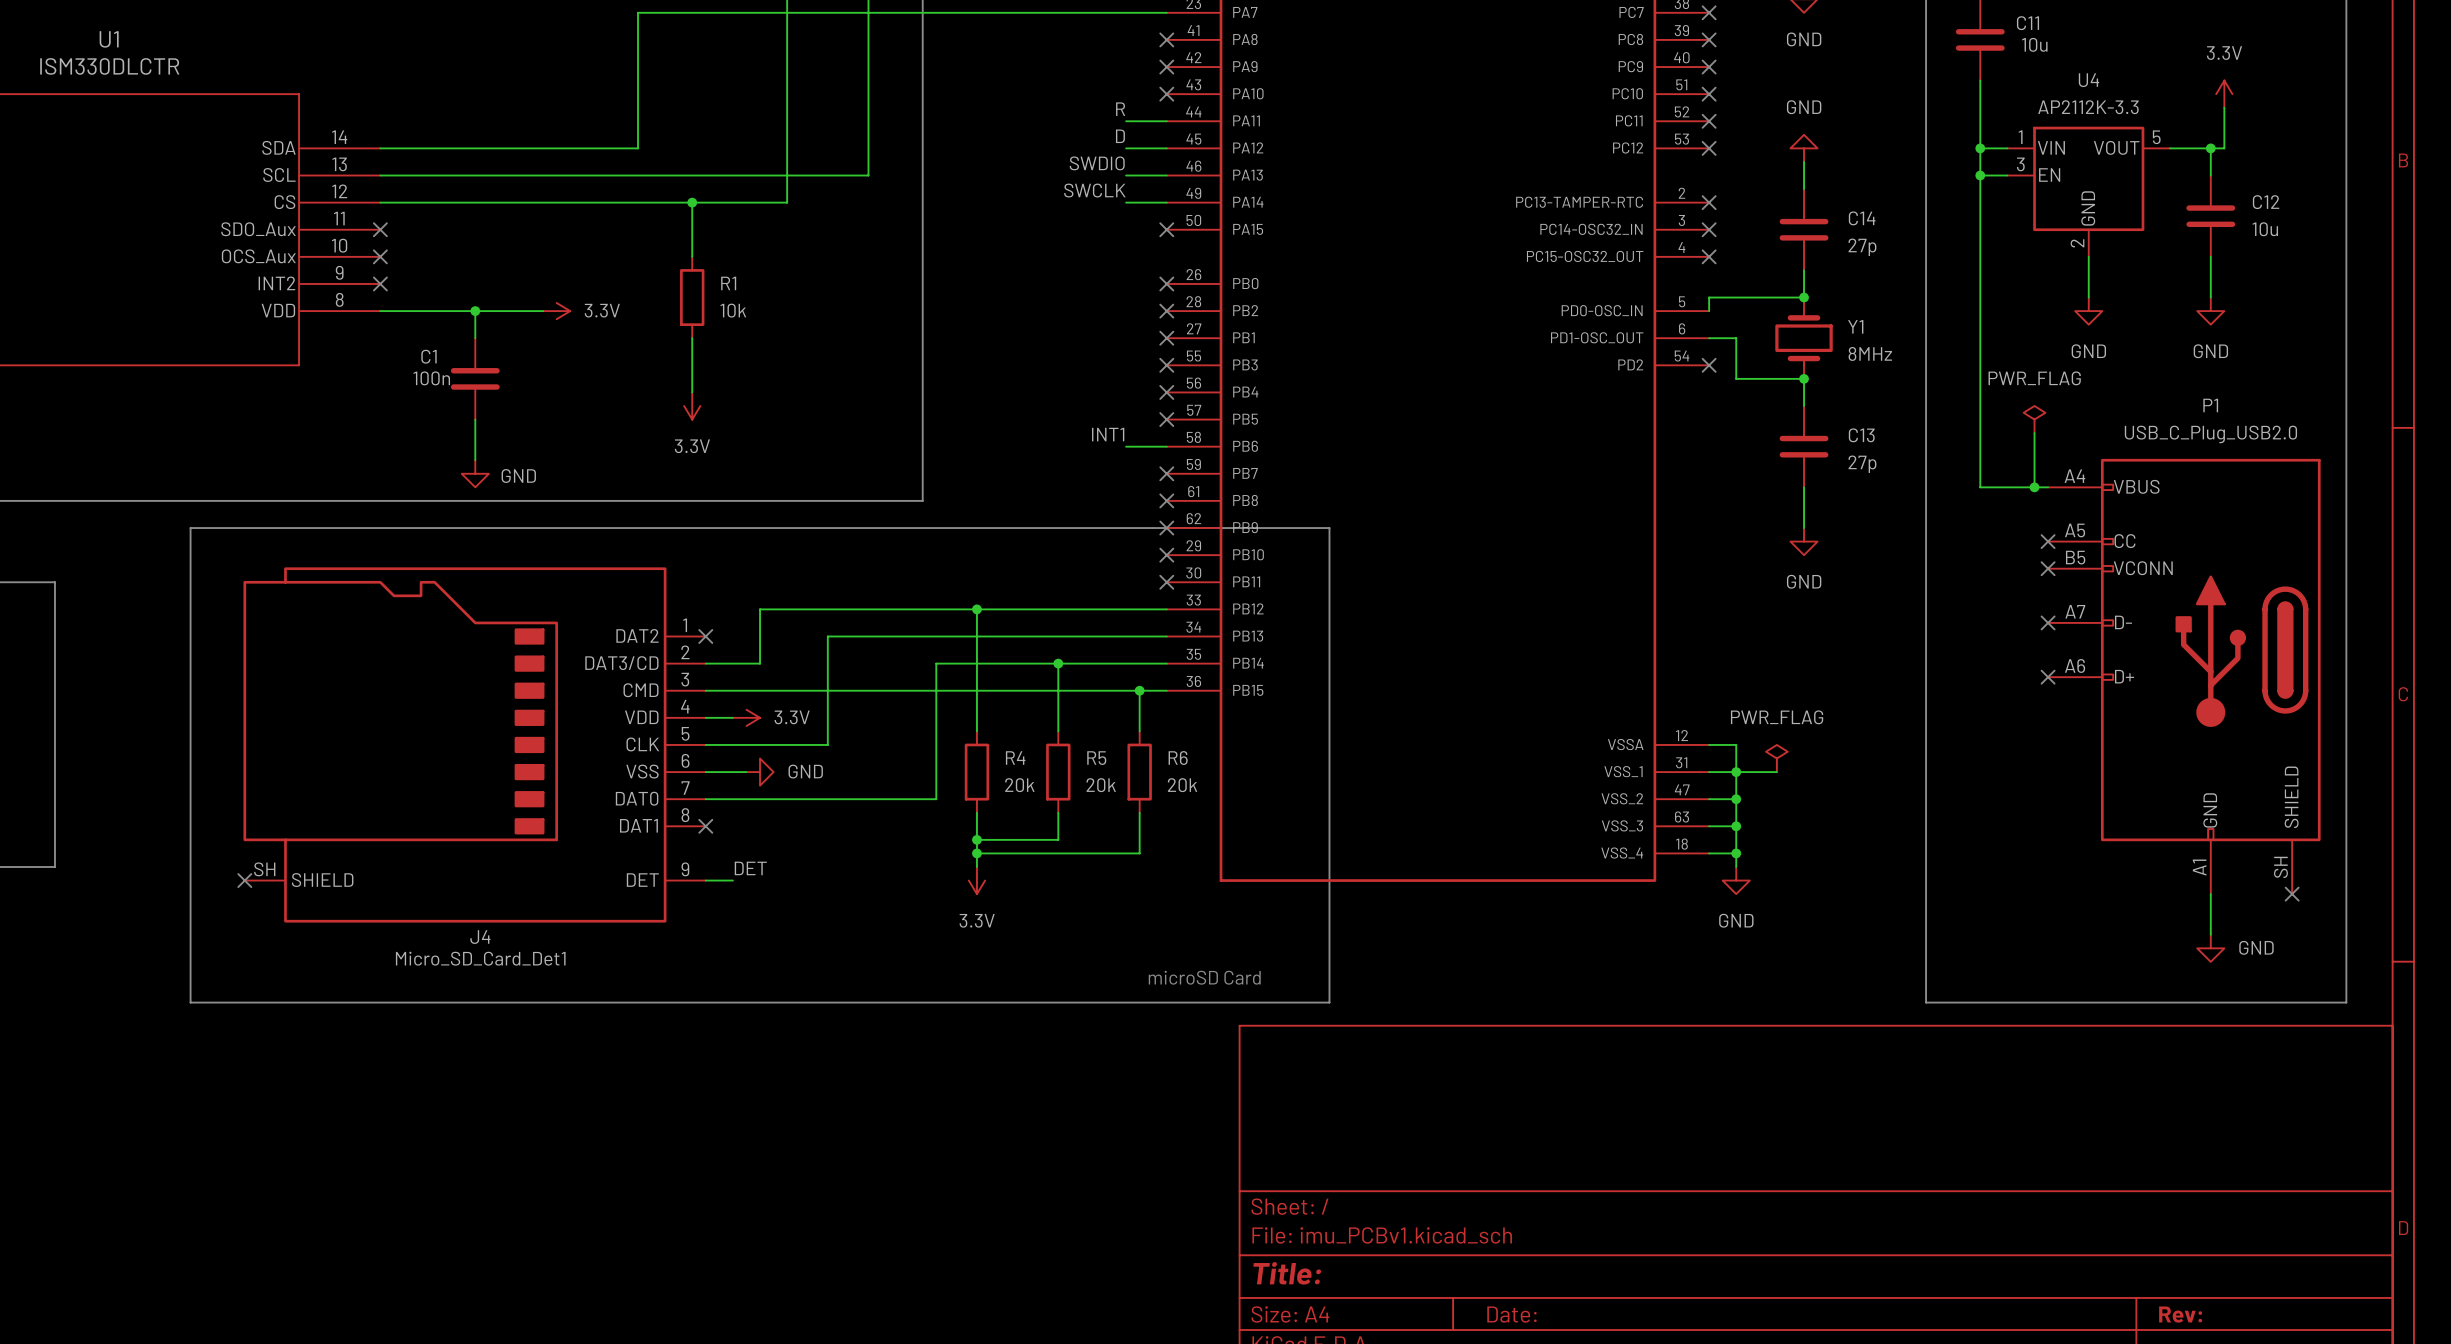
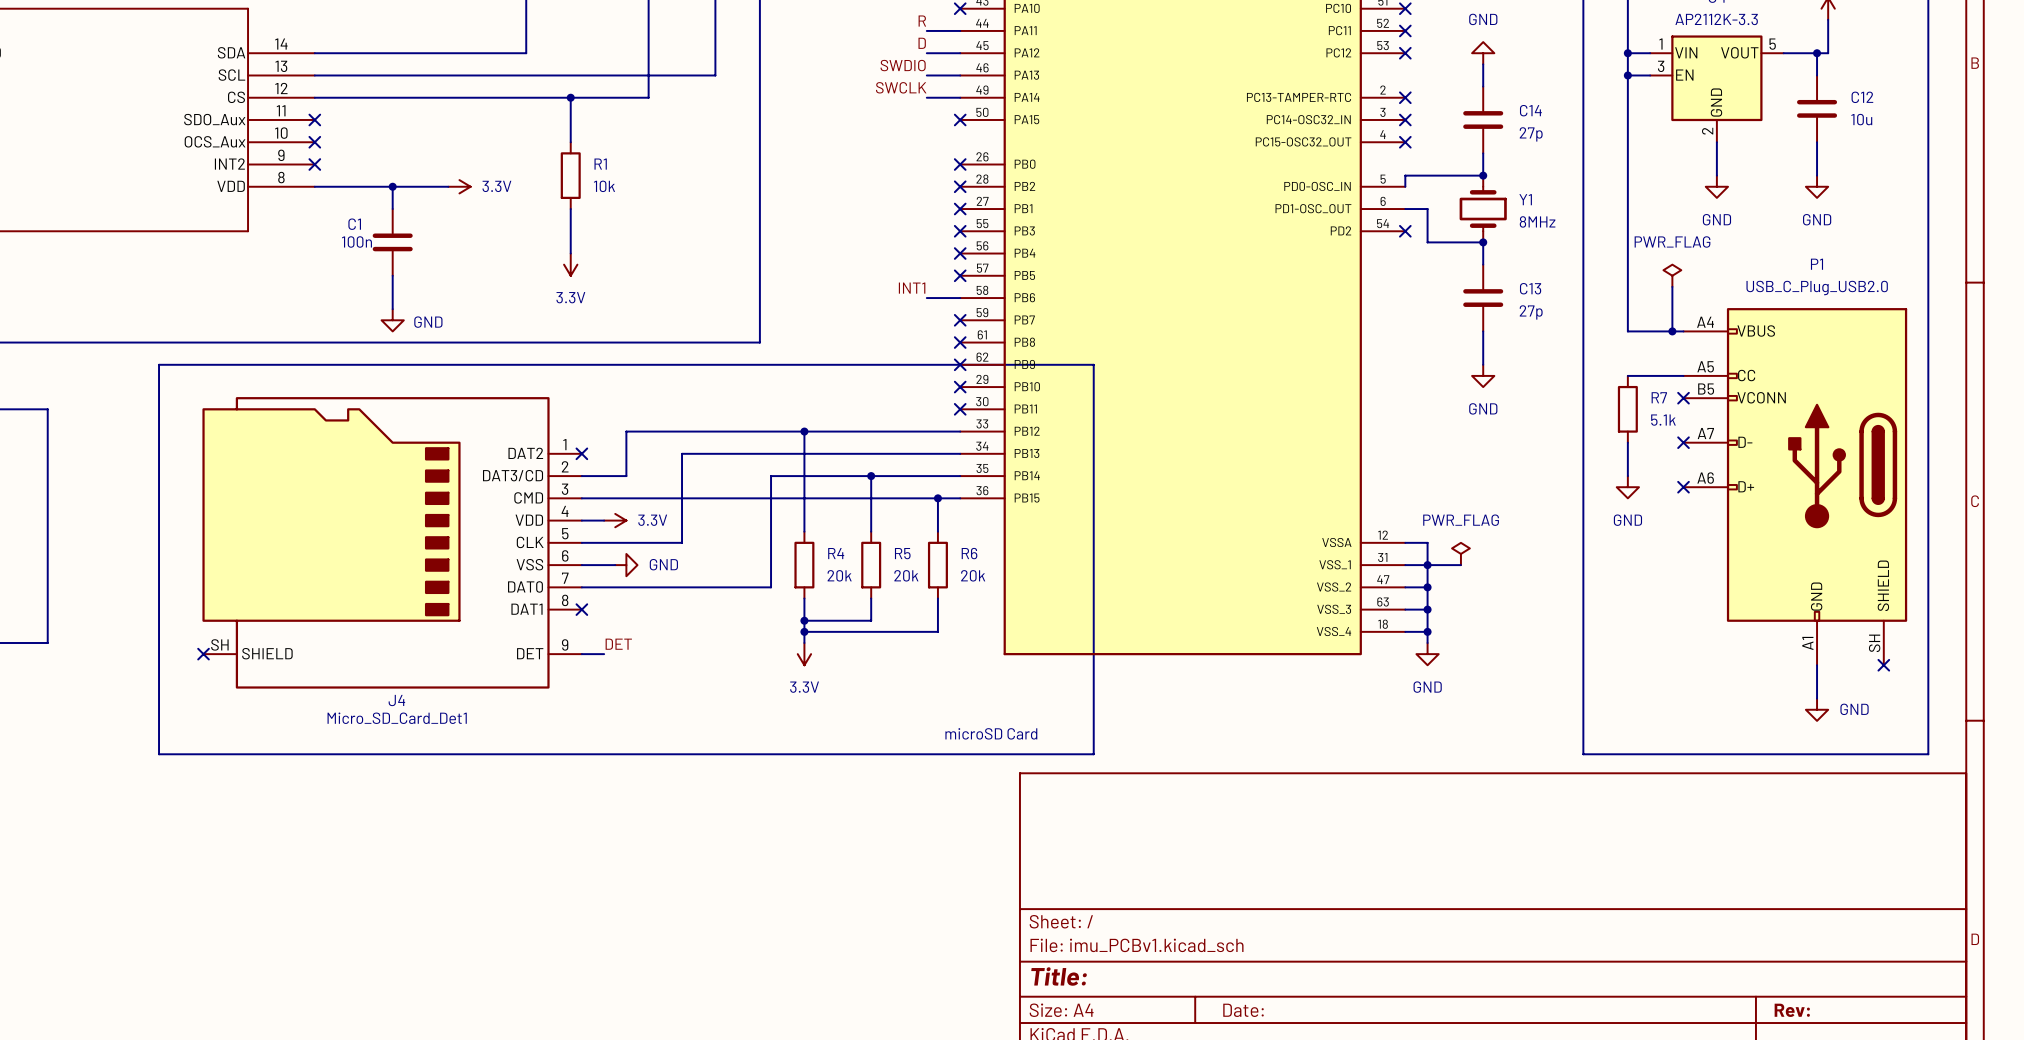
wire: none -> (1627, 375) (1683, 375)
no-connect mark: (2048, 541) -> none
R7: none -> 5.1k (1627, 409)
wire: none -> (1627, 442) (1627, 476)
power symbol: none -> GND (1627, 487)

